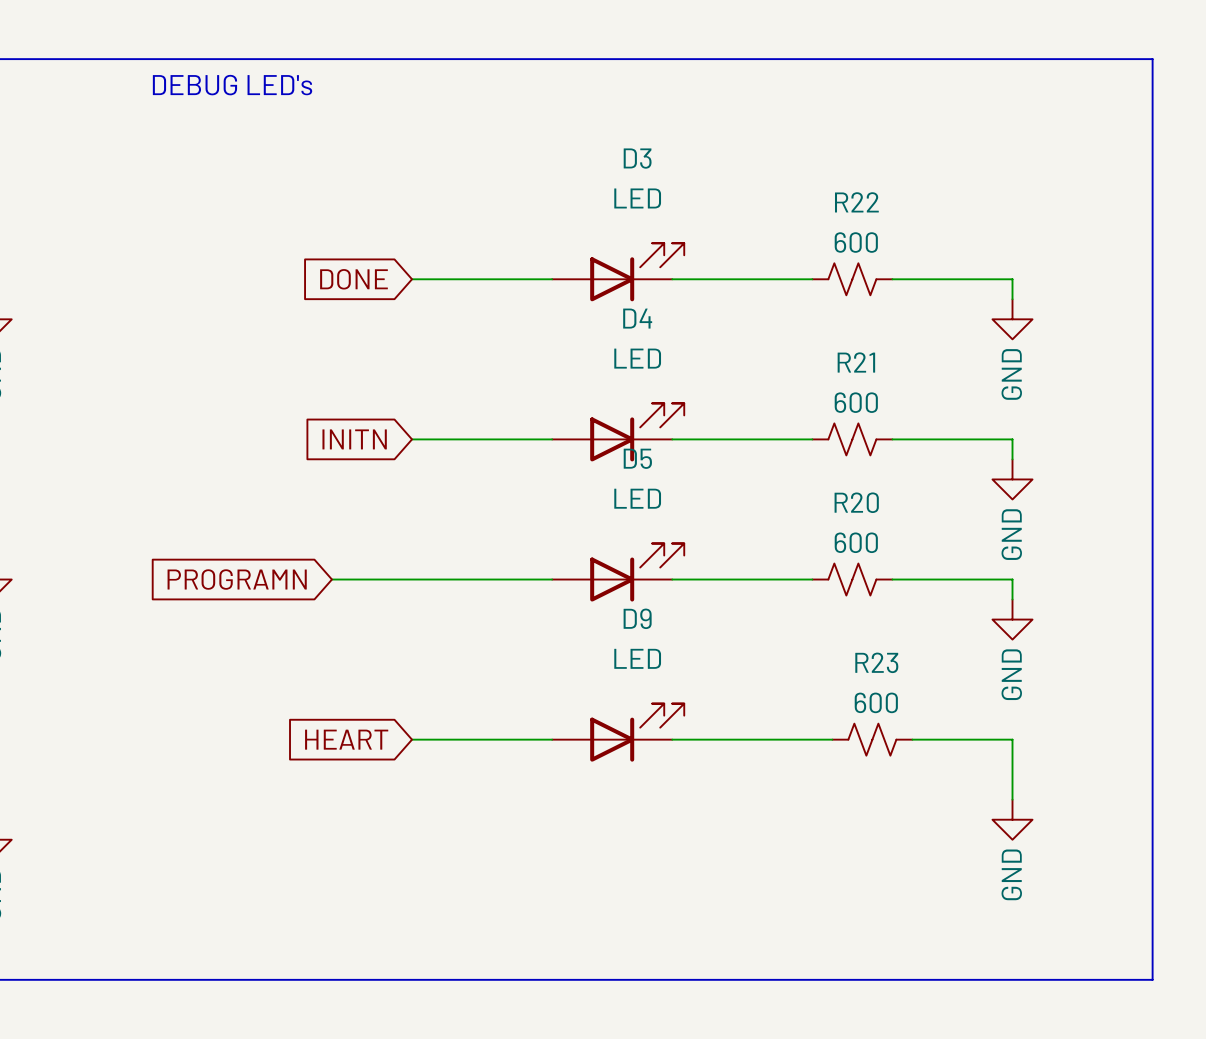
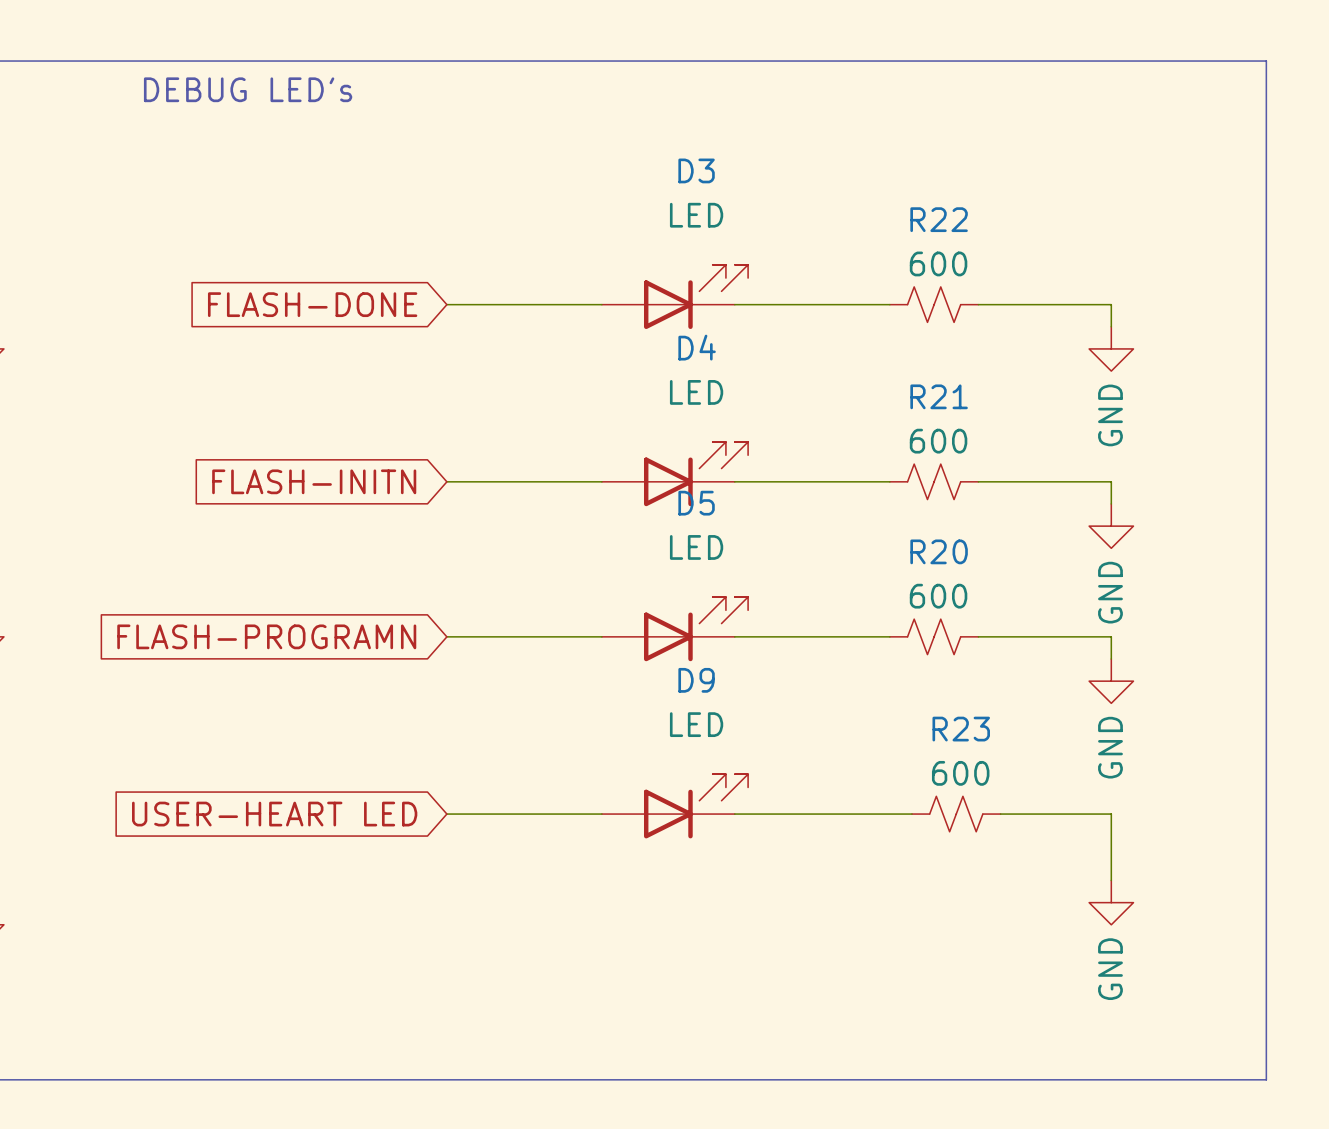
global label: DONE (353, 279) -> FLASH-DONE (312, 304)
global label: INITN (354, 439) -> FLASH-INITN (314, 481)
global label: PROGRAMN (237, 579) -> FLASH-PROGRAMN (266, 636)
wire: (331, 579) (412, 579) -> none
global label: HEART (346, 739) -> USER-HEART LED (274, 814)

